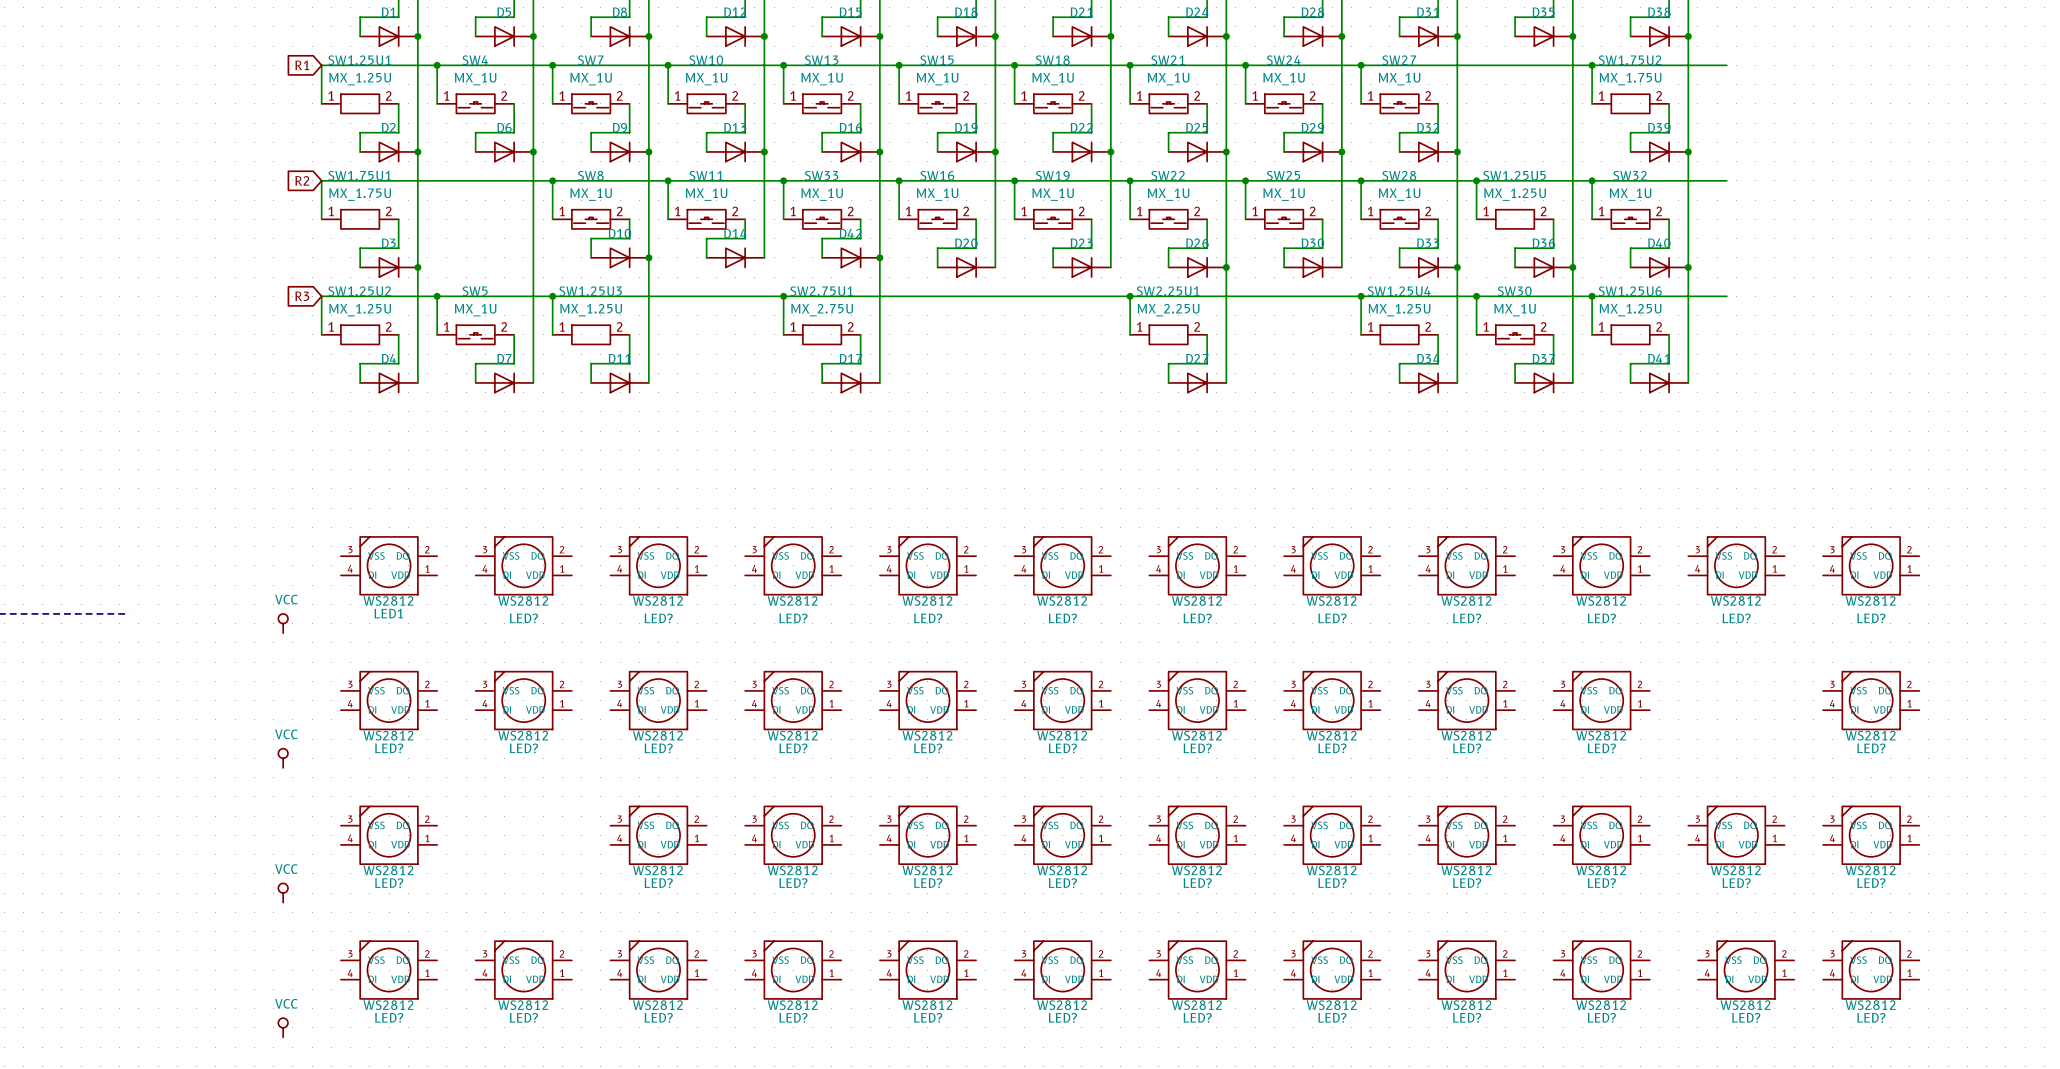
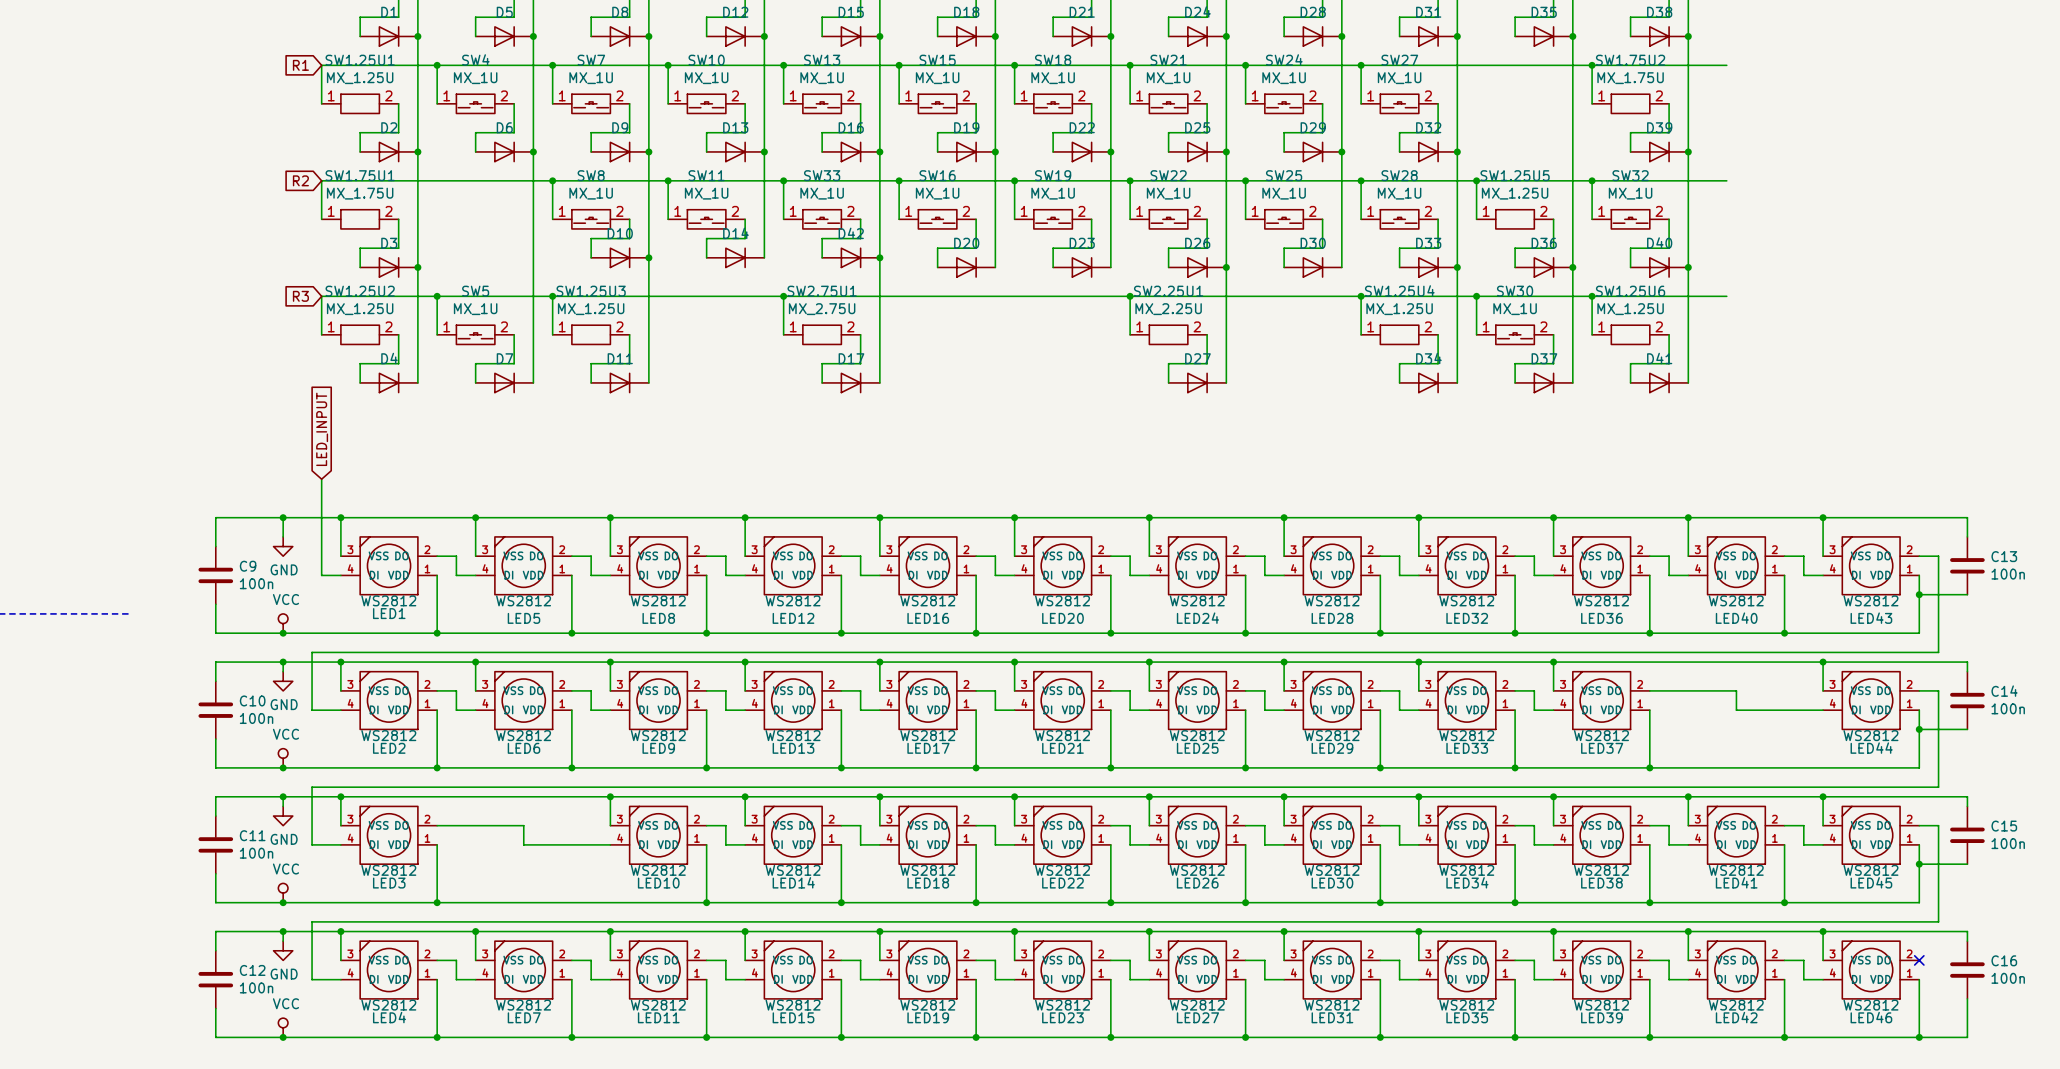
global label: none -> LED_INPUT (322, 429)
wire: none -> (321, 479) (321, 575) (340, 575)
wire: none -> (283, 517) (283, 536)
junction: none -> (283, 517)
wire: none -> (340, 517) (340, 556)
junction: none -> (340, 517)
wire: none -> (475, 517) (475, 556)
junction: none -> (475, 517)
wire: none -> (610, 517) (610, 556)
junction: none -> (610, 517)
wire: none -> (745, 517) (745, 556)
junction: none -> (745, 517)
wire: none -> (879, 517) (879, 556)
junction: none -> (879, 517)
wire: none -> (1014, 517) (1014, 556)
junction: none -> (1014, 517)
wire: none -> (1149, 517) (1149, 556)
junction: none -> (1149, 517)
wire: none -> (1284, 517) (1284, 556)
junction: none -> (1284, 517)
wire: none -> (1418, 517) (1418, 556)
junction: none -> (1418, 517)
wire: none -> (1553, 517) (1553, 556)
junction: none -> (1553, 517)
wire: none -> (1688, 517) (1688, 556)
junction: none -> (1688, 517)
wire: none -> (1823, 517) (1823, 556)
junction: none -> (1823, 517)
wire: none -> (1967, 536) (1967, 517) (215, 517) (215, 546)
power symbol: none -> GND (283, 546)
wire: none -> (437, 556) (456, 556) (456, 575) (475, 575)
wire: none -> (571, 556) (591, 556) (591, 575) (610, 575)
wire: none -> (706, 556) (725, 556) (725, 575) (745, 575)
wire: none -> (841, 556) (860, 556) (860, 575) (879, 575)
wire: none -> (976, 556) (995, 556) (995, 575) (1014, 575)
wire: none -> (1110, 556) (1130, 556) (1130, 575) (1149, 575)
wire: none -> (1245, 556) (1264, 556) (1264, 575) (1284, 575)
wire: none -> (1380, 556) (1399, 556) (1399, 575) (1418, 575)
wire: none -> (1515, 556) (1534, 556) (1534, 575) (1553, 575)
wire: none -> (1649, 556) (1669, 556) (1669, 575) (1688, 575)
wire: none -> (1784, 556) (1803, 556) (1803, 575) (1823, 575)
wire: none -> (1919, 556) (1938, 556) (1938, 652) (312, 652) (312, 710) (340, 710)
C13: none -> 100n (1967, 565)
C9: none -> 100n (215, 575)
wire: none -> (437, 575) (437, 633)
wire: none -> (571, 575) (571, 633)
wire: none -> (706, 575) (706, 633)
wire: none -> (841, 575) (841, 633)
wire: none -> (976, 575) (976, 633)
wire: none -> (1110, 575) (1110, 633)
wire: none -> (1245, 575) (1245, 633)
wire: none -> (1380, 575) (1380, 633)
wire: none -> (1515, 575) (1515, 633)
wire: none -> (1649, 575) (1649, 633)
wire: none -> (1784, 575) (1784, 633)
wire: none -> (1919, 575) (1919, 633) (215, 633) (215, 604)
wire: none -> (1919, 594) (1967, 594)
junction: none -> (1919, 594)
LED? name: LED? (523, 618) -> LED5 (524, 618)
LED? name: LED? (658, 618) -> LED8 (658, 618)
LED? name: LED? (793, 618) -> LED12 (793, 618)
LED? name: LED? (928, 618) -> LED16 (928, 618)
LED? name: LED? (1062, 618) -> LED20 (1062, 618)
LED? name: LED? (1197, 618) -> LED24 (1197, 618)
LED? name: LED? (1332, 618) -> LED28 (1332, 618)
LED? name: LED? (1467, 618) -> LED32 (1467, 618)
LED? name: LED? (1601, 618) -> LED36 (1601, 618)
LED? name: LED? (1736, 618) -> LED40 (1736, 618)
LED? name: LED? (1871, 618) -> LED43 (1871, 618)
junction: none -> (283, 633)
junction: none -> (437, 633)
junction: none -> (571, 633)
junction: none -> (706, 633)
junction: none -> (841, 633)
junction: none -> (976, 633)
junction: none -> (1110, 633)
junction: none -> (1245, 633)
junction: none -> (1380, 633)
junction: none -> (1515, 633)
junction: none -> (1649, 633)
junction: none -> (1784, 633)
wire: none -> (283, 662) (283, 671)
junction: none -> (283, 662)
wire: none -> (340, 662) (340, 690)
junction: none -> (340, 662)
wire: none -> (475, 662) (475, 690)
junction: none -> (475, 662)
wire: none -> (610, 662) (610, 690)
junction: none -> (610, 662)
wire: none -> (745, 662) (745, 690)
junction: none -> (745, 662)
wire: none -> (879, 662) (879, 690)
junction: none -> (879, 662)
wire: none -> (1014, 662) (1014, 690)
junction: none -> (1014, 662)
wire: none -> (1149, 662) (1149, 690)
junction: none -> (1149, 662)
wire: none -> (1284, 662) (1284, 690)
junction: none -> (1284, 662)
wire: none -> (1418, 662) (1418, 690)
junction: none -> (1418, 662)
wire: none -> (1553, 662) (1553, 690)
junction: none -> (1553, 662)
wire: none -> (1823, 662) (1823, 690)
junction: none -> (1823, 662)
wire: none -> (1967, 671) (1967, 662) (215, 662) (215, 681)
power symbol: none -> GND (283, 681)
wire: none -> (437, 690) (456, 690) (456, 710) (475, 710)
wire: none -> (571, 690) (591, 690) (591, 710) (610, 710)
wire: none -> (706, 690) (725, 690) (725, 710) (745, 710)
wire: none -> (841, 690) (860, 690) (860, 710) (879, 710)
wire: none -> (976, 690) (995, 690) (995, 710) (1014, 710)
wire: none -> (1110, 690) (1130, 690) (1130, 710) (1149, 710)
wire: none -> (1245, 690) (1264, 690) (1264, 710) (1284, 710)
wire: none -> (1380, 690) (1399, 690) (1399, 710) (1418, 710)
wire: none -> (1515, 690) (1534, 690) (1534, 710) (1553, 710)
wire: none -> (1649, 690) (1736, 690) (1736, 710) (1823, 710)
wire: none -> (1919, 690) (1938, 690) (1938, 787) (312, 787) (312, 844) (340, 844)
C14: none -> 100n (1967, 700)
C10: none -> 100n (215, 710)
wire: none -> (437, 710) (437, 767)
wire: none -> (571, 710) (571, 767)
wire: none -> (706, 710) (706, 767)
wire: none -> (841, 710) (841, 767)
wire: none -> (976, 710) (976, 767)
wire: none -> (1110, 710) (1110, 767)
wire: none -> (1245, 710) (1245, 767)
wire: none -> (1380, 710) (1380, 767)
wire: none -> (1515, 710) (1515, 767)
wire: none -> (1649, 710) (1649, 767)
wire: none -> (1919, 710) (1919, 767) (215, 767) (215, 739)
wire: none -> (1919, 729) (1967, 729)
junction: none -> (1919, 729)
LED? name: LED? (389, 748) -> LED2 (389, 748)
LED? name: LED? (523, 748) -> LED6 (524, 748)
LED? name: LED? (658, 748) -> LED9 (658, 748)
LED? name: LED? (793, 748) -> LED13 (793, 748)
LED? name: LED? (928, 748) -> LED17 (928, 748)
LED? name: LED? (1062, 748) -> LED21 (1062, 748)
LED? name: LED? (1197, 748) -> LED25 (1197, 748)
LED? name: LED? (1332, 748) -> LED29 (1332, 748)
LED? name: LED? (1467, 748) -> LED33 (1467, 748)
LED? name: LED? (1601, 748) -> LED37 (1602, 748)
LED? name: LED? (1871, 748) -> LED44 (1871, 748)
junction: none -> (283, 767)
junction: none -> (437, 767)
junction: none -> (571, 767)
junction: none -> (706, 767)
junction: none -> (841, 767)
junction: none -> (976, 767)
junction: none -> (1110, 767)
junction: none -> (1245, 767)
junction: none -> (1380, 767)
junction: none -> (1515, 767)
junction: none -> (1649, 767)
wire: none -> (283, 796) (283, 806)
junction: none -> (283, 796)
wire: none -> (340, 796) (340, 825)
junction: none -> (340, 796)
wire: none -> (610, 796) (610, 825)
junction: none -> (610, 796)
wire: none -> (745, 796) (745, 825)
junction: none -> (745, 796)
wire: none -> (879, 796) (879, 825)
junction: none -> (879, 796)
wire: none -> (1014, 796) (1014, 825)
junction: none -> (1014, 796)
wire: none -> (1149, 796) (1149, 825)
junction: none -> (1149, 796)
wire: none -> (1284, 796) (1284, 825)
junction: none -> (1284, 796)
wire: none -> (1418, 796) (1418, 825)
junction: none -> (1418, 796)
wire: none -> (1553, 796) (1553, 825)
junction: none -> (1553, 796)
wire: none -> (1688, 796) (1688, 825)
junction: none -> (1688, 796)
wire: none -> (1823, 796) (1823, 825)
junction: none -> (1823, 796)
wire: none -> (1967, 806) (1967, 796) (215, 796) (215, 816)
power symbol: none -> GND (283, 816)
wire: none -> (437, 825) (523, 825) (523, 844) (610, 844)
wire: none -> (706, 825) (725, 825) (725, 844) (745, 844)
wire: none -> (841, 825) (860, 825) (860, 844) (879, 844)
wire: none -> (976, 825) (995, 825) (995, 844) (1014, 844)
wire: none -> (1110, 825) (1130, 825) (1130, 844) (1149, 844)
wire: none -> (1245, 825) (1264, 825) (1264, 844) (1284, 844)
wire: none -> (1380, 825) (1399, 825) (1399, 844) (1418, 844)
wire: none -> (1515, 825) (1534, 825) (1534, 844) (1553, 844)
wire: none -> (1649, 825) (1669, 825) (1669, 844) (1688, 844)
wire: none -> (1784, 825) (1803, 825) (1803, 844) (1823, 844)
wire: none -> (1919, 825) (1938, 825) (1938, 921) (312, 921) (312, 979) (340, 979)
C15: none -> 100n (1967, 835)
C11: none -> 100n (215, 844)
wire: none -> (437, 844) (437, 902)
wire: none -> (706, 844) (706, 902)
wire: none -> (841, 844) (841, 902)
wire: none -> (976, 844) (976, 902)
wire: none -> (1110, 844) (1110, 902)
wire: none -> (1245, 844) (1245, 902)
wire: none -> (1380, 844) (1380, 902)
wire: none -> (1515, 844) (1515, 902)
wire: none -> (1649, 844) (1649, 902)
wire: none -> (1784, 844) (1784, 902)
wire: none -> (1919, 844) (1919, 902) (215, 902) (215, 873)
wire: none -> (1919, 864) (1967, 864)
junction: none -> (1919, 864)
LED? name: LED? (389, 883) -> LED3 (389, 883)
LED? name: LED? (658, 883) -> LED10 (658, 883)
LED? name: LED? (793, 883) -> LED14 (793, 882)
LED? name: LED? (928, 883) -> LED18 (928, 883)
LED? name: LED? (1062, 883) -> LED22 (1062, 883)
LED? name: LED? (1197, 883) -> LED26 (1197, 883)
LED? name: LED? (1332, 883) -> LED30 (1332, 883)
LED? name: LED? (1467, 883) -> LED34 (1467, 882)
LED? name: LED? (1601, 883) -> LED38 (1601, 883)
LED? name: LED? (1736, 883) -> LED41 (1736, 882)
LED? name: LED? (1871, 883) -> LED45 (1871, 882)
junction: none -> (283, 902)
junction: none -> (437, 902)
junction: none -> (706, 902)
junction: none -> (841, 902)
junction: none -> (976, 902)
junction: none -> (1110, 902)
junction: none -> (1245, 902)
junction: none -> (1380, 902)
junction: none -> (1515, 902)
junction: none -> (1649, 902)
junction: none -> (1784, 902)
wire: none -> (283, 931) (283, 941)
junction: none -> (283, 931)
wire: none -> (340, 931) (340, 960)
junction: none -> (340, 931)
wire: none -> (475, 931) (475, 960)
junction: none -> (475, 931)
wire: none -> (610, 931) (610, 960)
junction: none -> (610, 931)
wire: none -> (745, 931) (745, 960)
junction: none -> (745, 931)
wire: none -> (879, 931) (879, 960)
junction: none -> (879, 931)
wire: none -> (1014, 931) (1014, 960)
junction: none -> (1014, 931)
wire: none -> (1149, 931) (1149, 960)
junction: none -> (1149, 931)
wire: none -> (1284, 931) (1284, 960)
junction: none -> (1284, 931)
wire: none -> (1418, 931) (1418, 960)
junction: none -> (1418, 931)
wire: none -> (1553, 931) (1553, 960)
junction: none -> (1553, 931)
wire: none -> (1688, 931) (1688, 960)
junction: none -> (1688, 931)
wire: none -> (1823, 931) (1823, 960)
junction: none -> (1823, 931)
wire: none -> (1967, 941) (1967, 931) (215, 931) (215, 950)
power symbol: none -> GND (283, 950)
wire: none -> (437, 960) (456, 960) (456, 979) (475, 979)
wire: none -> (571, 960) (591, 960) (591, 979) (610, 979)
wire: none -> (706, 960) (725, 960) (725, 979) (745, 979)
wire: none -> (841, 960) (860, 960) (860, 979) (879, 979)
wire: none -> (976, 960) (995, 960) (995, 979) (1014, 979)
wire: none -> (1110, 960) (1130, 960) (1130, 979) (1149, 979)
wire: none -> (1245, 960) (1264, 960) (1264, 979) (1284, 979)
wire: none -> (1380, 960) (1399, 960) (1399, 979) (1418, 979)
wire: none -> (1515, 960) (1534, 960) (1534, 979) (1553, 979)
wire: none -> (1649, 960) (1669, 960) (1669, 979) (1688, 979)
wire: none -> (1784, 960) (1803, 960) (1803, 979) (1823, 979)
no-connect mark: none -> (1919, 960)
LED42: none -> WS2812 (1736, 970)
LED?: WS2812 (1746, 970) -> none
C16: none -> 100n (1967, 970)
C12: none -> 100n (215, 979)
wire: none -> (437, 979) (437, 1037)
wire: none -> (571, 979) (571, 1037)
wire: none -> (706, 979) (706, 1037)
wire: none -> (841, 979) (841, 1037)
wire: none -> (976, 979) (976, 1037)
wire: none -> (1110, 979) (1110, 1037)
wire: none -> (1245, 979) (1245, 1037)
wire: none -> (1380, 979) (1380, 1037)
wire: none -> (1515, 979) (1515, 1037)
wire: none -> (1649, 979) (1649, 1037)
wire: none -> (1784, 979) (1784, 1037)
wire: none -> (1919, 979) (1919, 1037)
wire: none -> (1967, 998) (1967, 1037) (215, 1037) (215, 1008)
LED? name: LED? (389, 1017) -> LED4 (389, 1017)
LED? name: LED? (523, 1017) -> LED7 (524, 1017)
LED? name: LED? (658, 1017) -> LED11 (658, 1017)
LED? name: LED? (793, 1017) -> LED15 (793, 1017)
LED? name: LED? (928, 1017) -> LED19 (928, 1017)
LED? name: LED? (1062, 1017) -> LED23 (1062, 1017)
LED? name: LED? (1197, 1017) -> LED27 (1197, 1017)
LED? name: LED? (1332, 1017) -> LED31 (1332, 1017)
LED? name: LED? (1467, 1017) -> LED35 (1467, 1017)
LED? name: LED? (1601, 1017) -> LED39 (1601, 1017)
LED? name: LED? (1871, 1017) -> LED46 (1871, 1017)
junction: none -> (283, 1037)
junction: none -> (437, 1037)
junction: none -> (571, 1037)
junction: none -> (706, 1037)
junction: none -> (841, 1037)
junction: none -> (976, 1037)
junction: none -> (1110, 1037)
junction: none -> (1245, 1037)
junction: none -> (1380, 1037)
junction: none -> (1515, 1037)
junction: none -> (1649, 1037)
junction: none -> (1784, 1037)
junction: none -> (1919, 1037)

